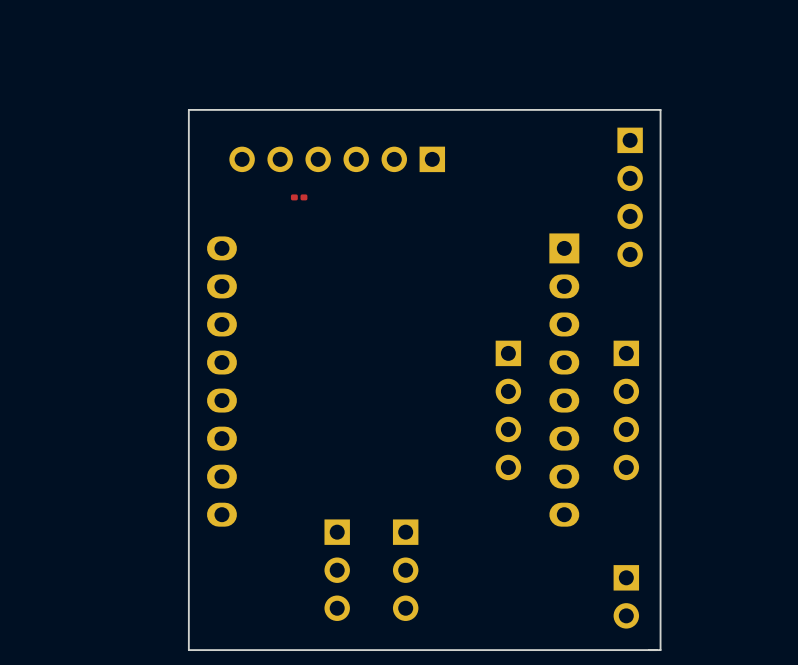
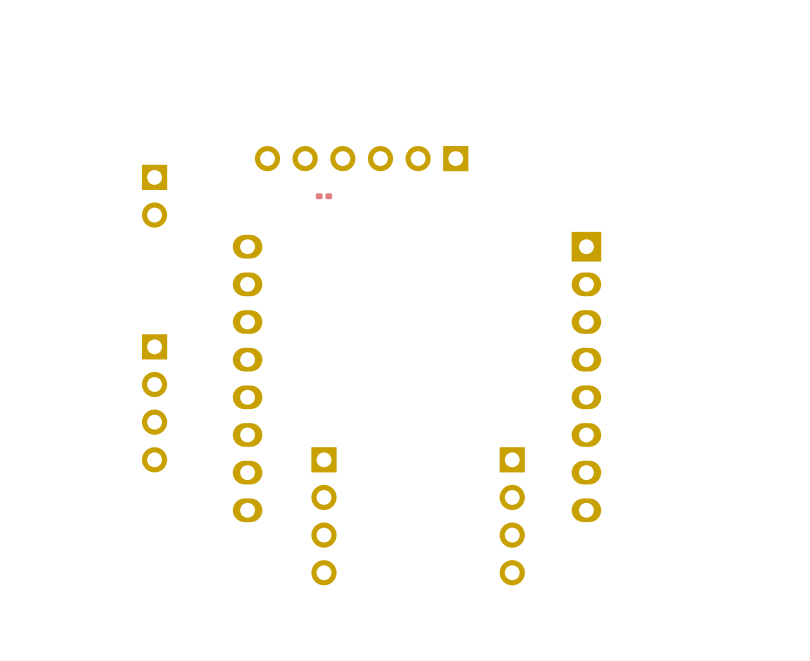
board edge: (660, 109) (660, 650) (188, 650) (188, 109) (660, 109) -> none
part: none -> (154, 196)
part: (630, 197) -> none
part: none -> (154, 403)
part: (508, 410) -> none
part: (626, 410) -> none
part: none -> (323, 516)
part: none -> (512, 516)
part: (337, 570) -> none
part: (405, 570) -> none
part: (626, 596) -> none

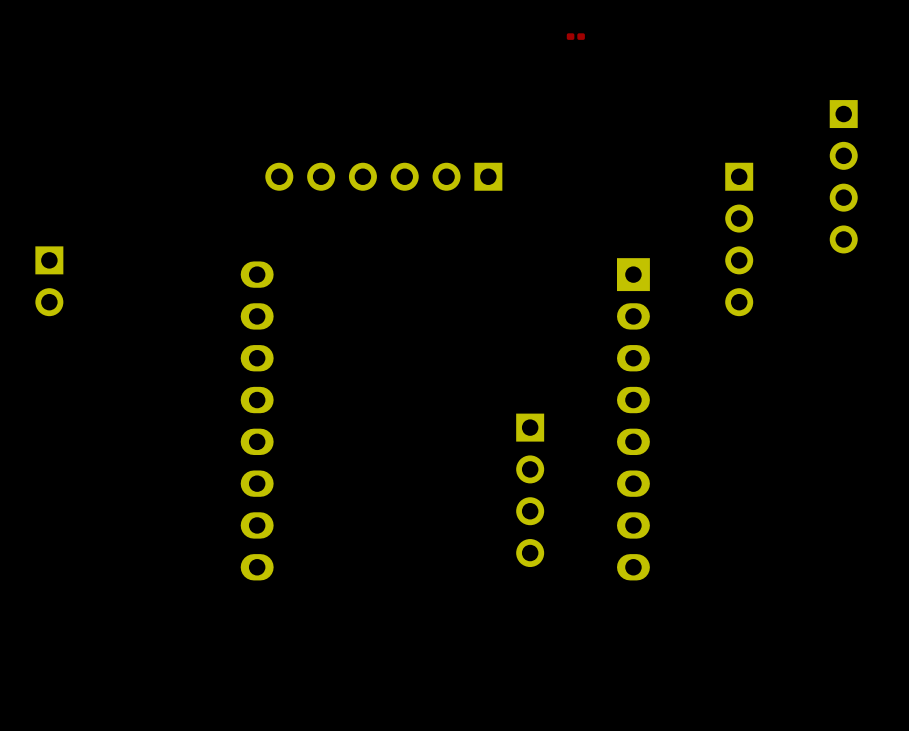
part: none -> (843, 176)
part position: (154, 196) -> (49, 281)
part position: (323, 196) -> (575, 36)
part: none -> (739, 239)
part: (154, 403) -> none
part: (323, 516) -> none
part position: (512, 516) -> (530, 490)

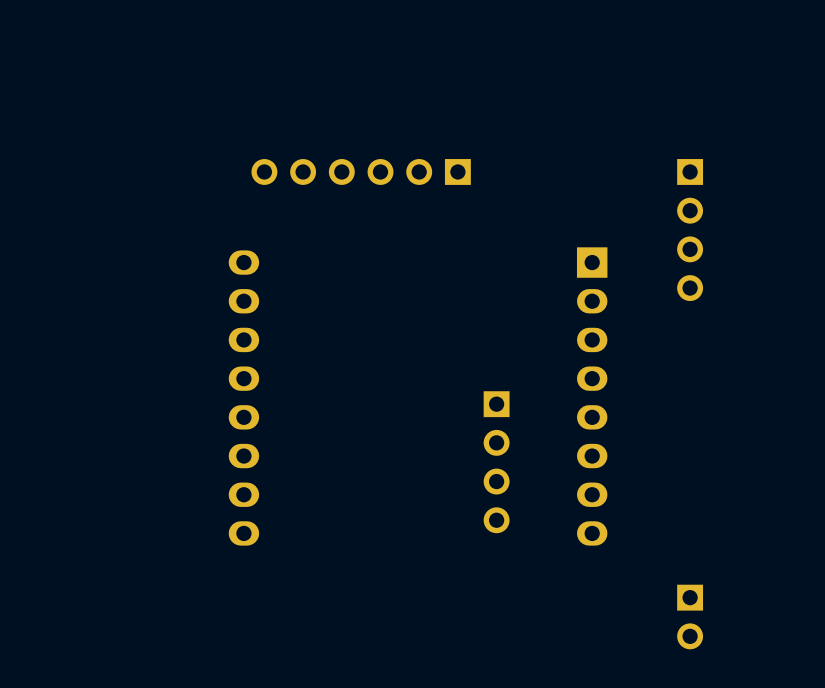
part: (575, 36) -> none
part: (843, 176) -> none
part: (49, 281) -> none
part: none -> (690, 617)

